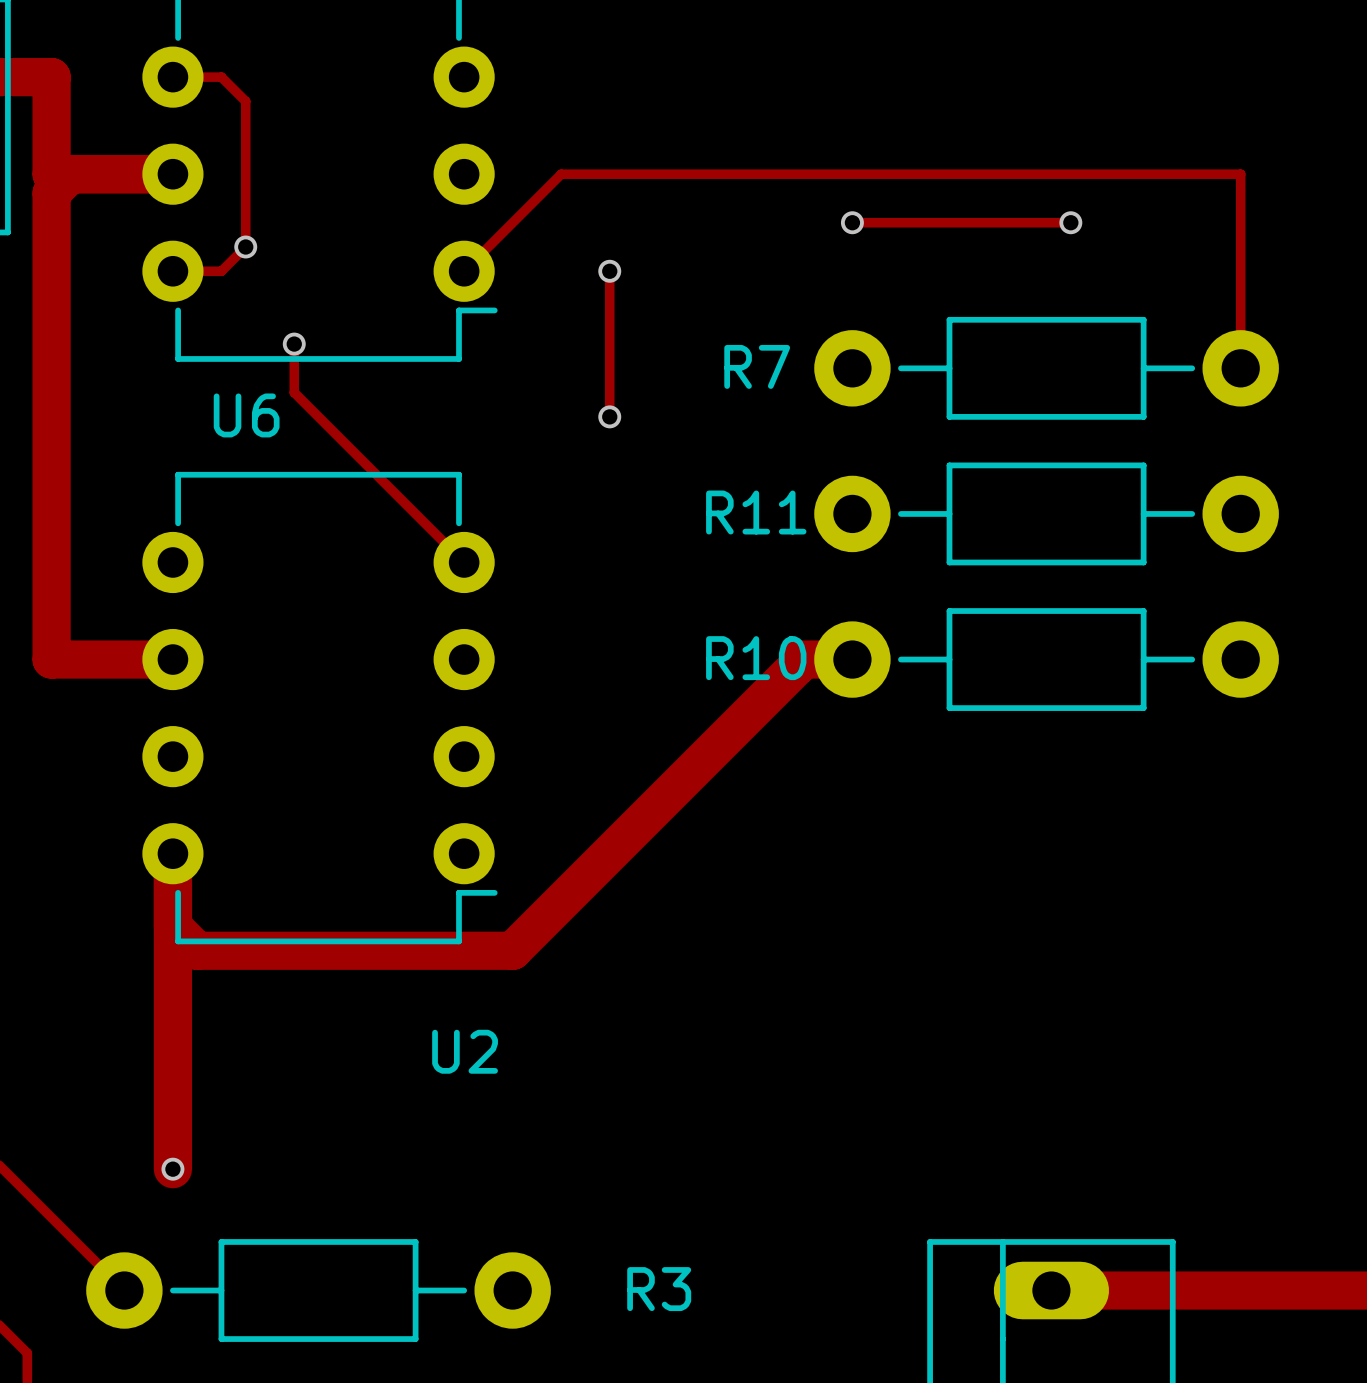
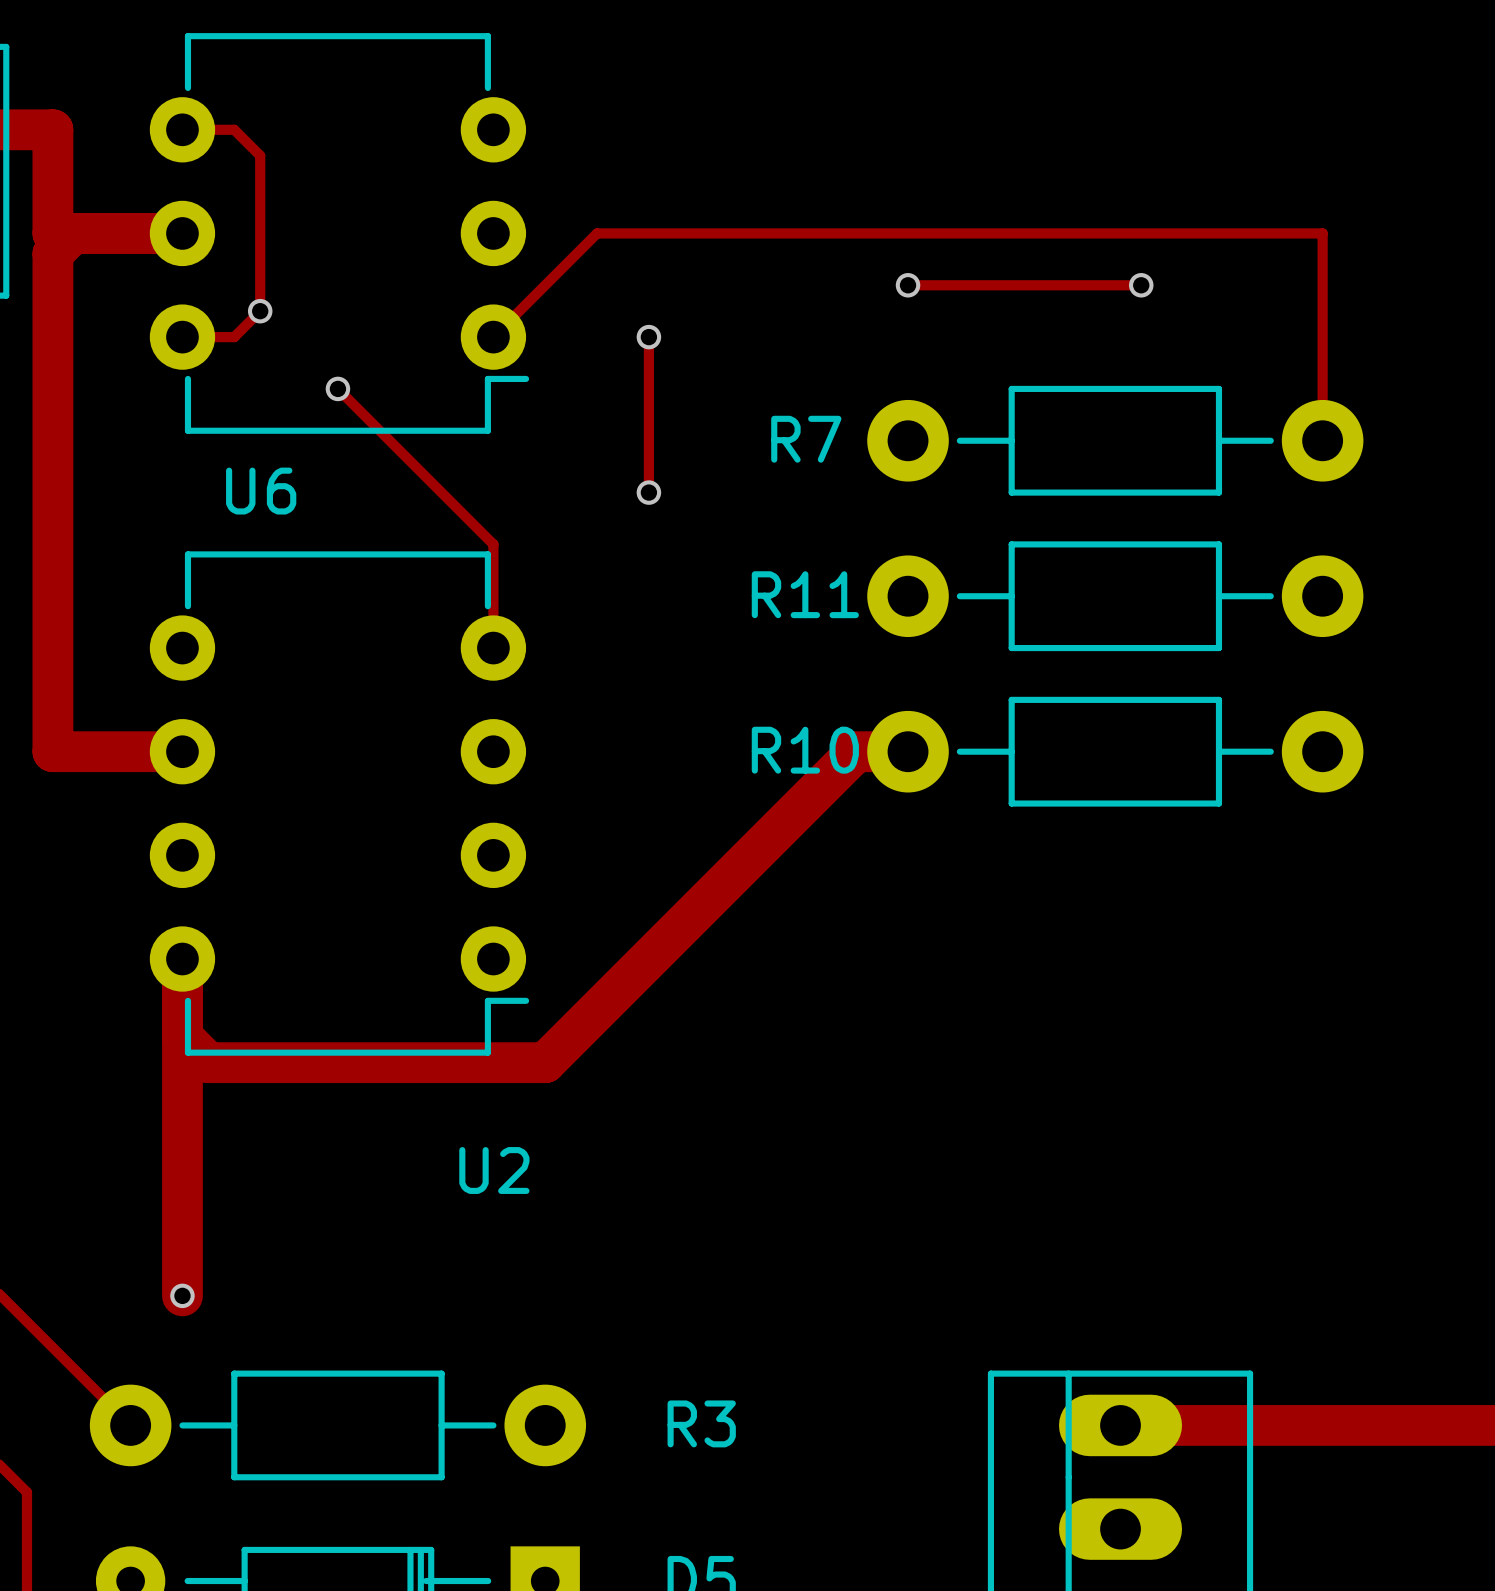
track: (294, 344) (294, 392) (464, 562) -> (337, 388) (493, 544) (493, 648)
via position: (294, 344) -> (337, 388)

